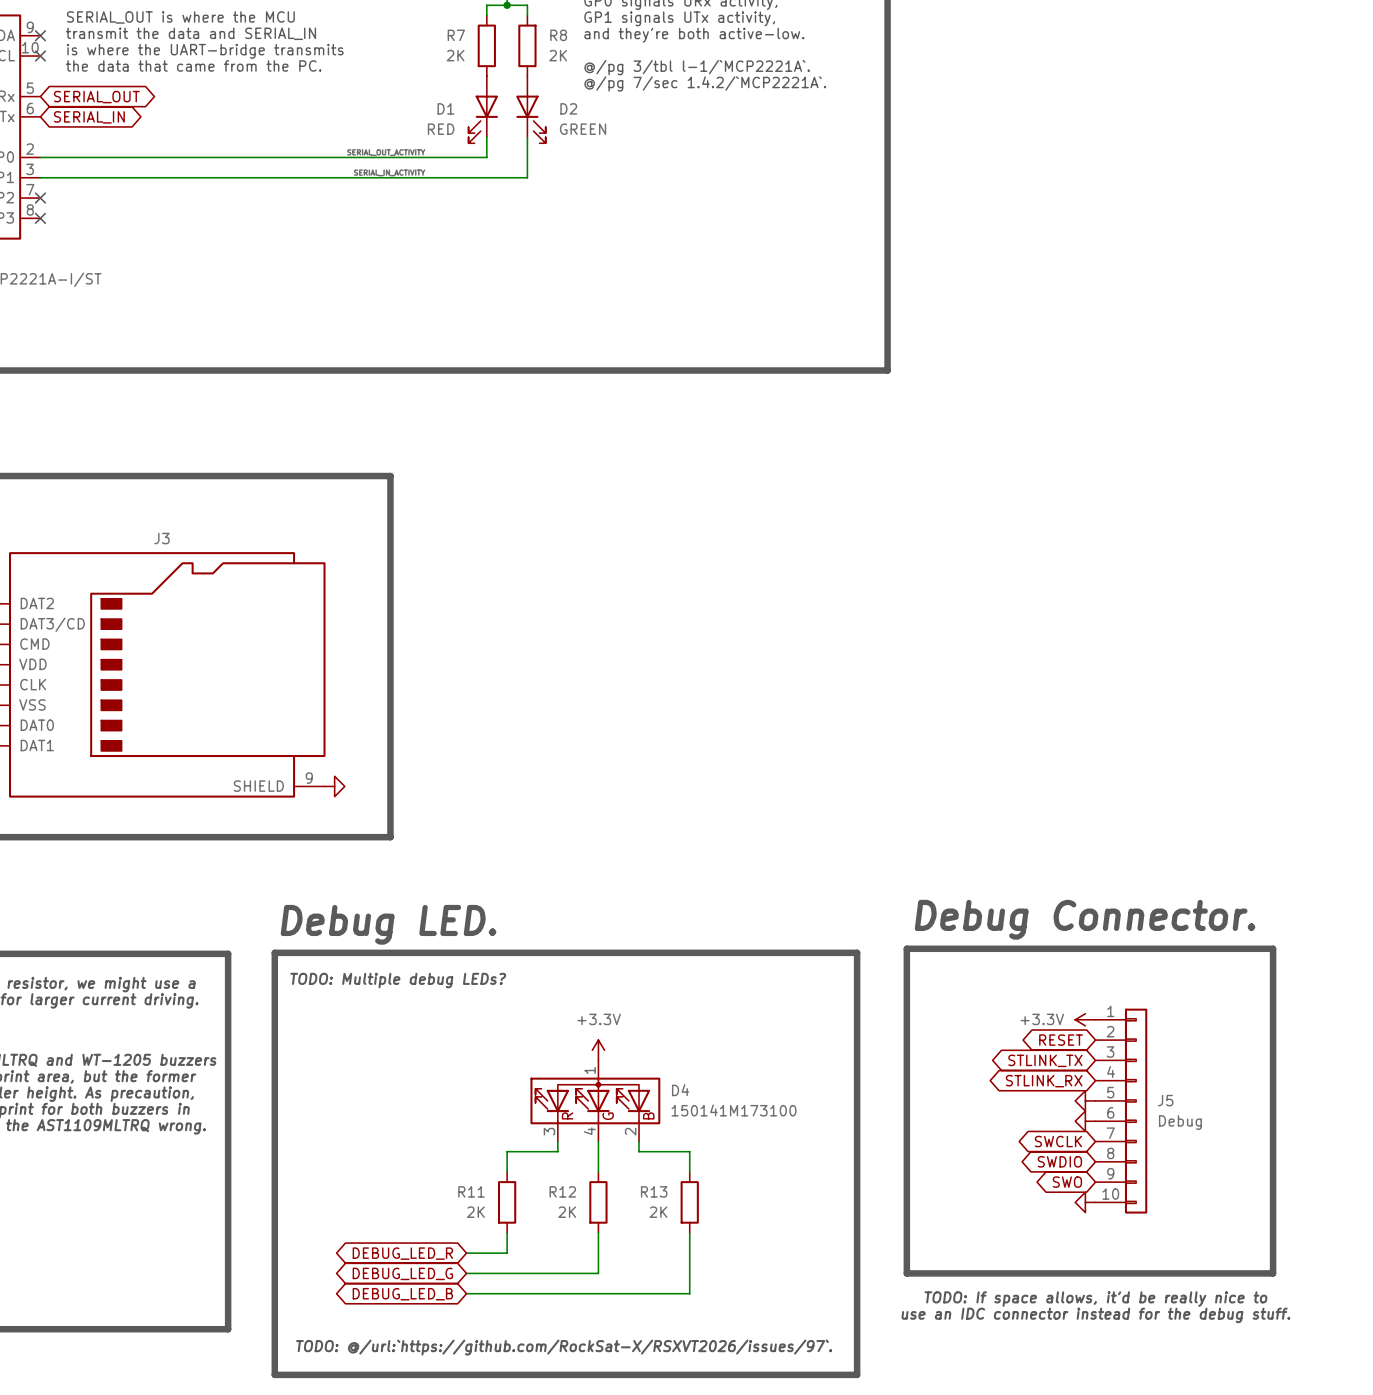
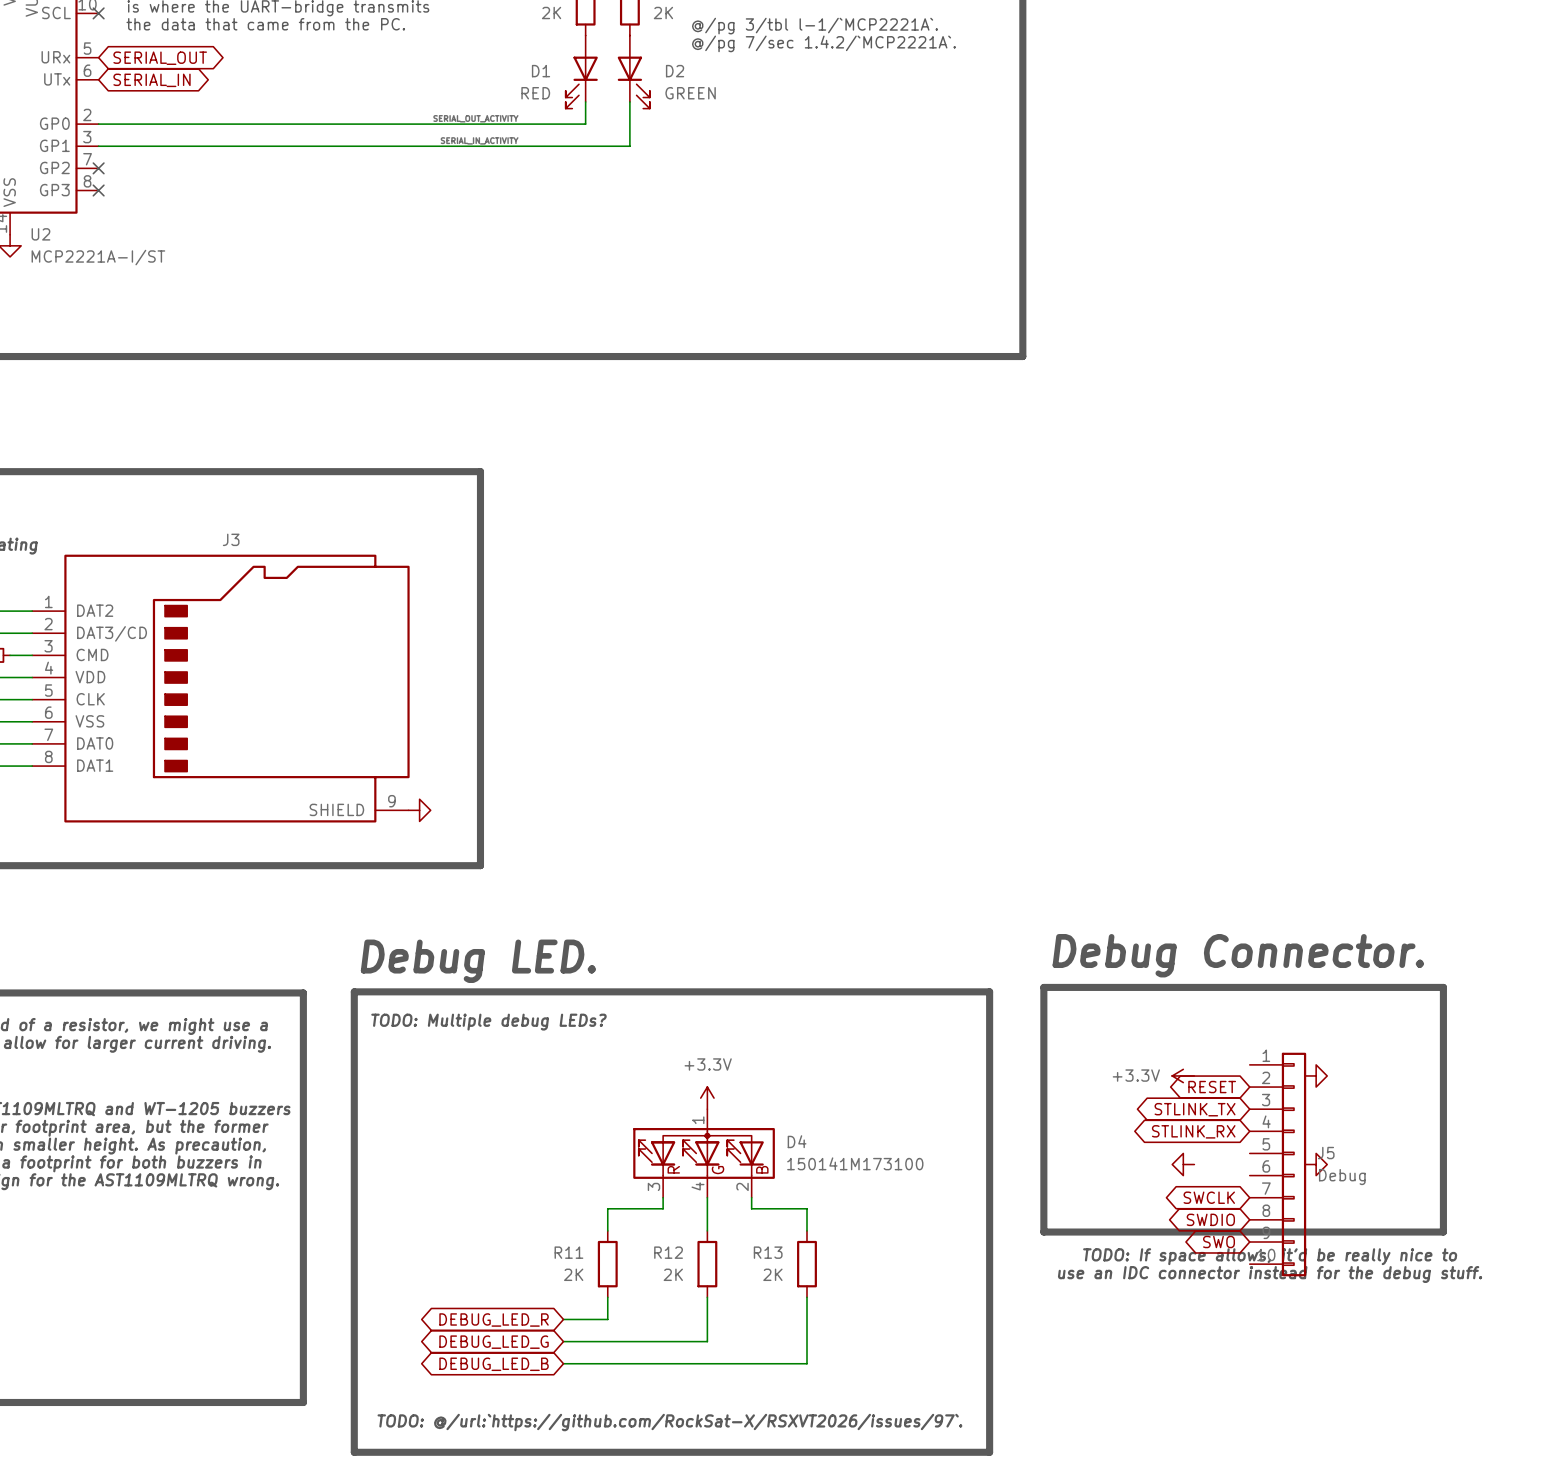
power symbol position: +3.3V (1085, 1019) -> +3.3V (1183, 1075)
power symbol: none -> (1316, 1075)
power symbol: (1085, 1100) -> none
power symbol: none -> (1183, 1164)
power symbol: none -> (1316, 1164)
power symbol: (1085, 1121) -> none
line: (906, 1172) (906, 1273) (1273, 1273) (1273, 1172) -> (1043, 1232) (1443, 1232)
power symbol: (1085, 1202) -> none
text position: TODO: If space allows, it'd be really nice to (1095, 1299) -> TODO: If space allows, it'd be really nice to (1270, 1256)
text position: use an IDC connector instead for the debug stuff. (1095, 1315) -> use an IDC connector instead for the debug stuff. (1270, 1274)

